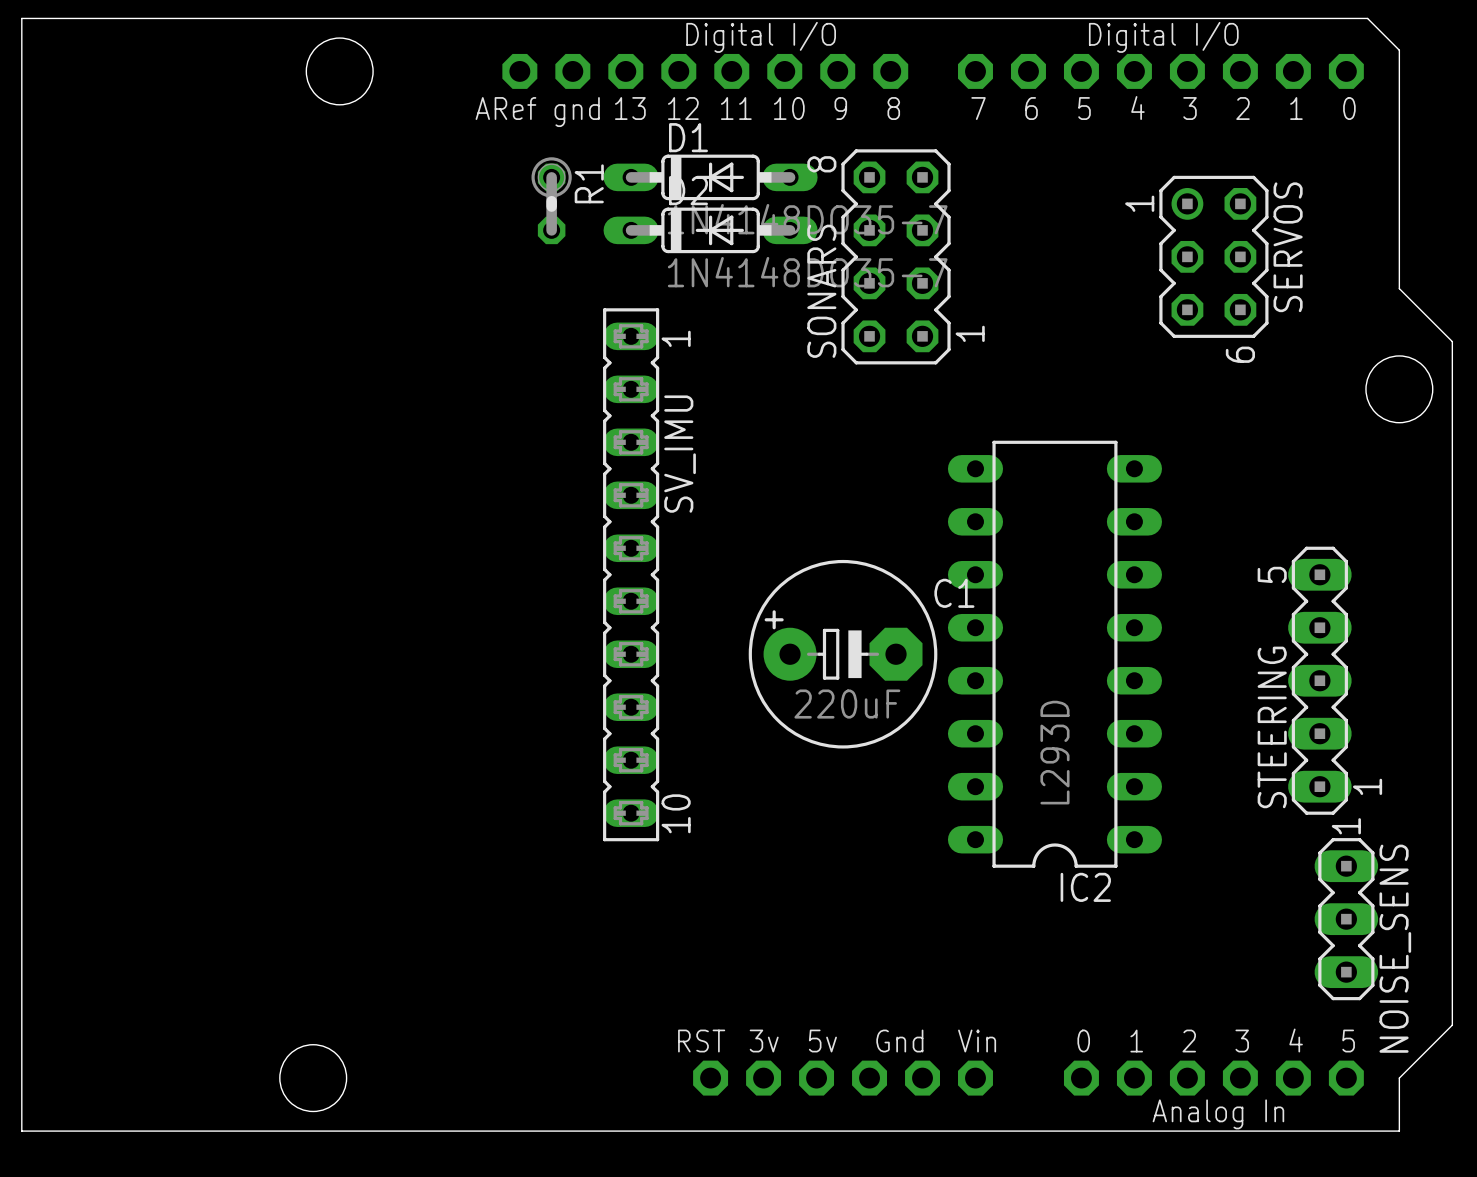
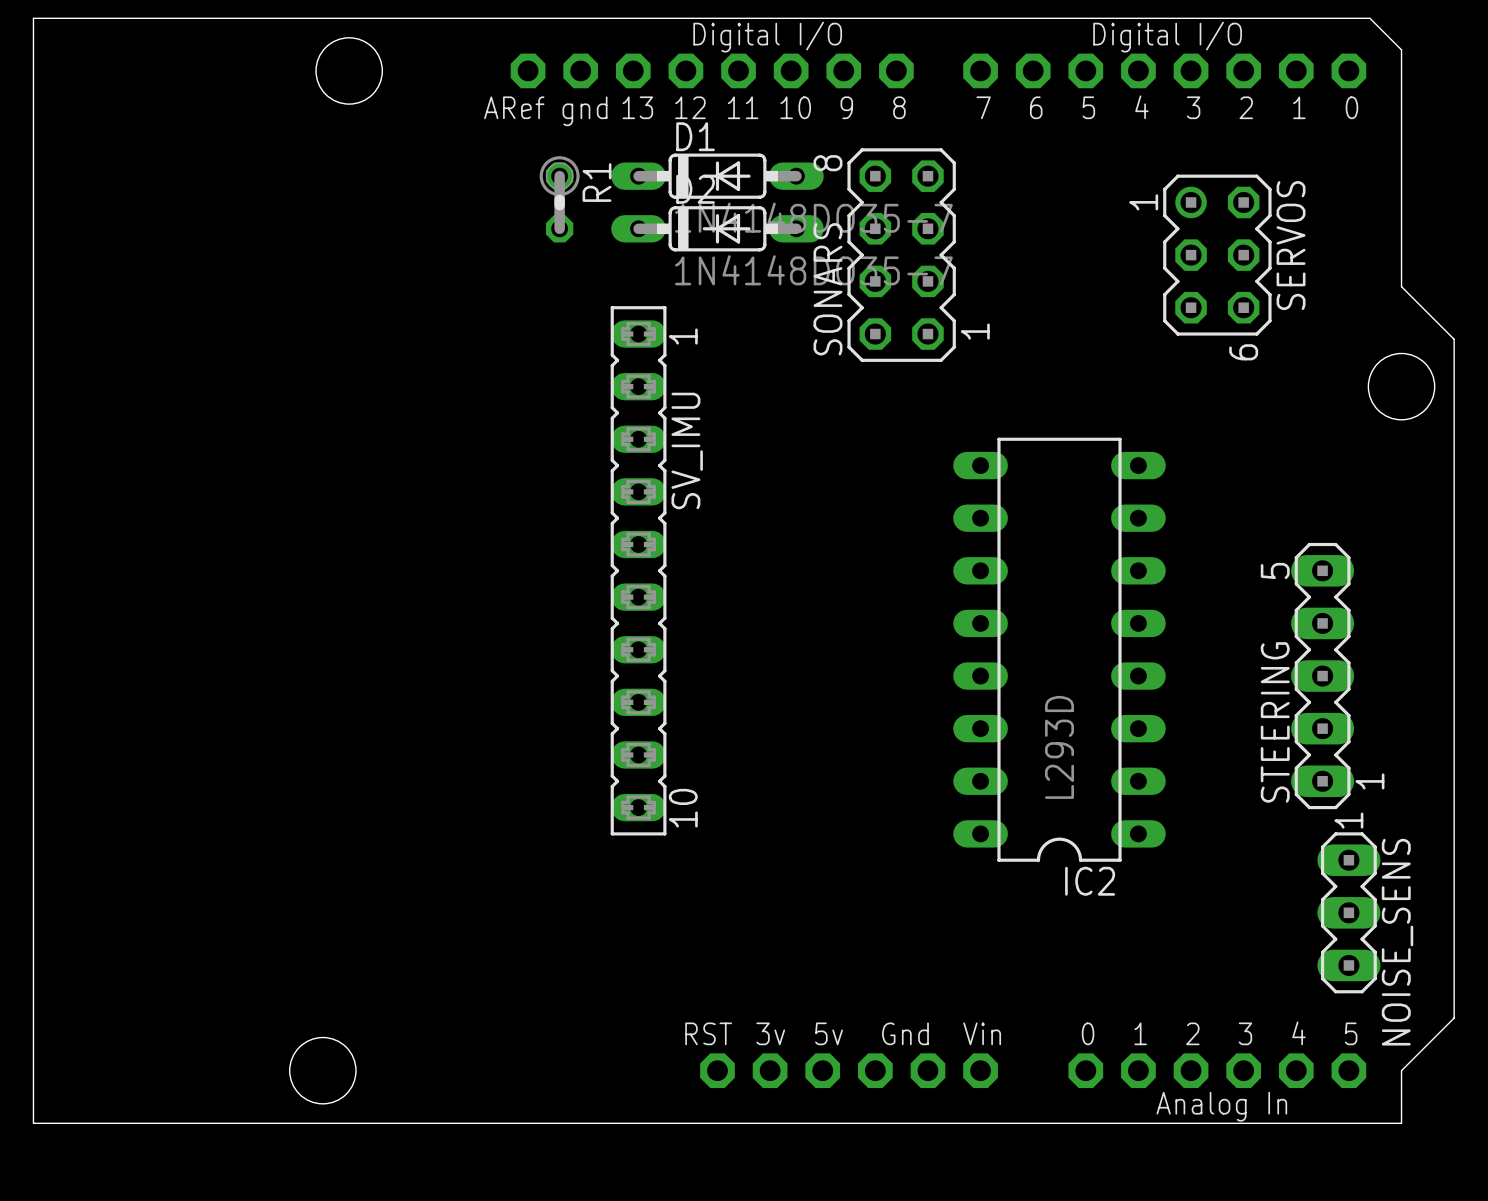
C1: 220uF (843, 654) -> none

